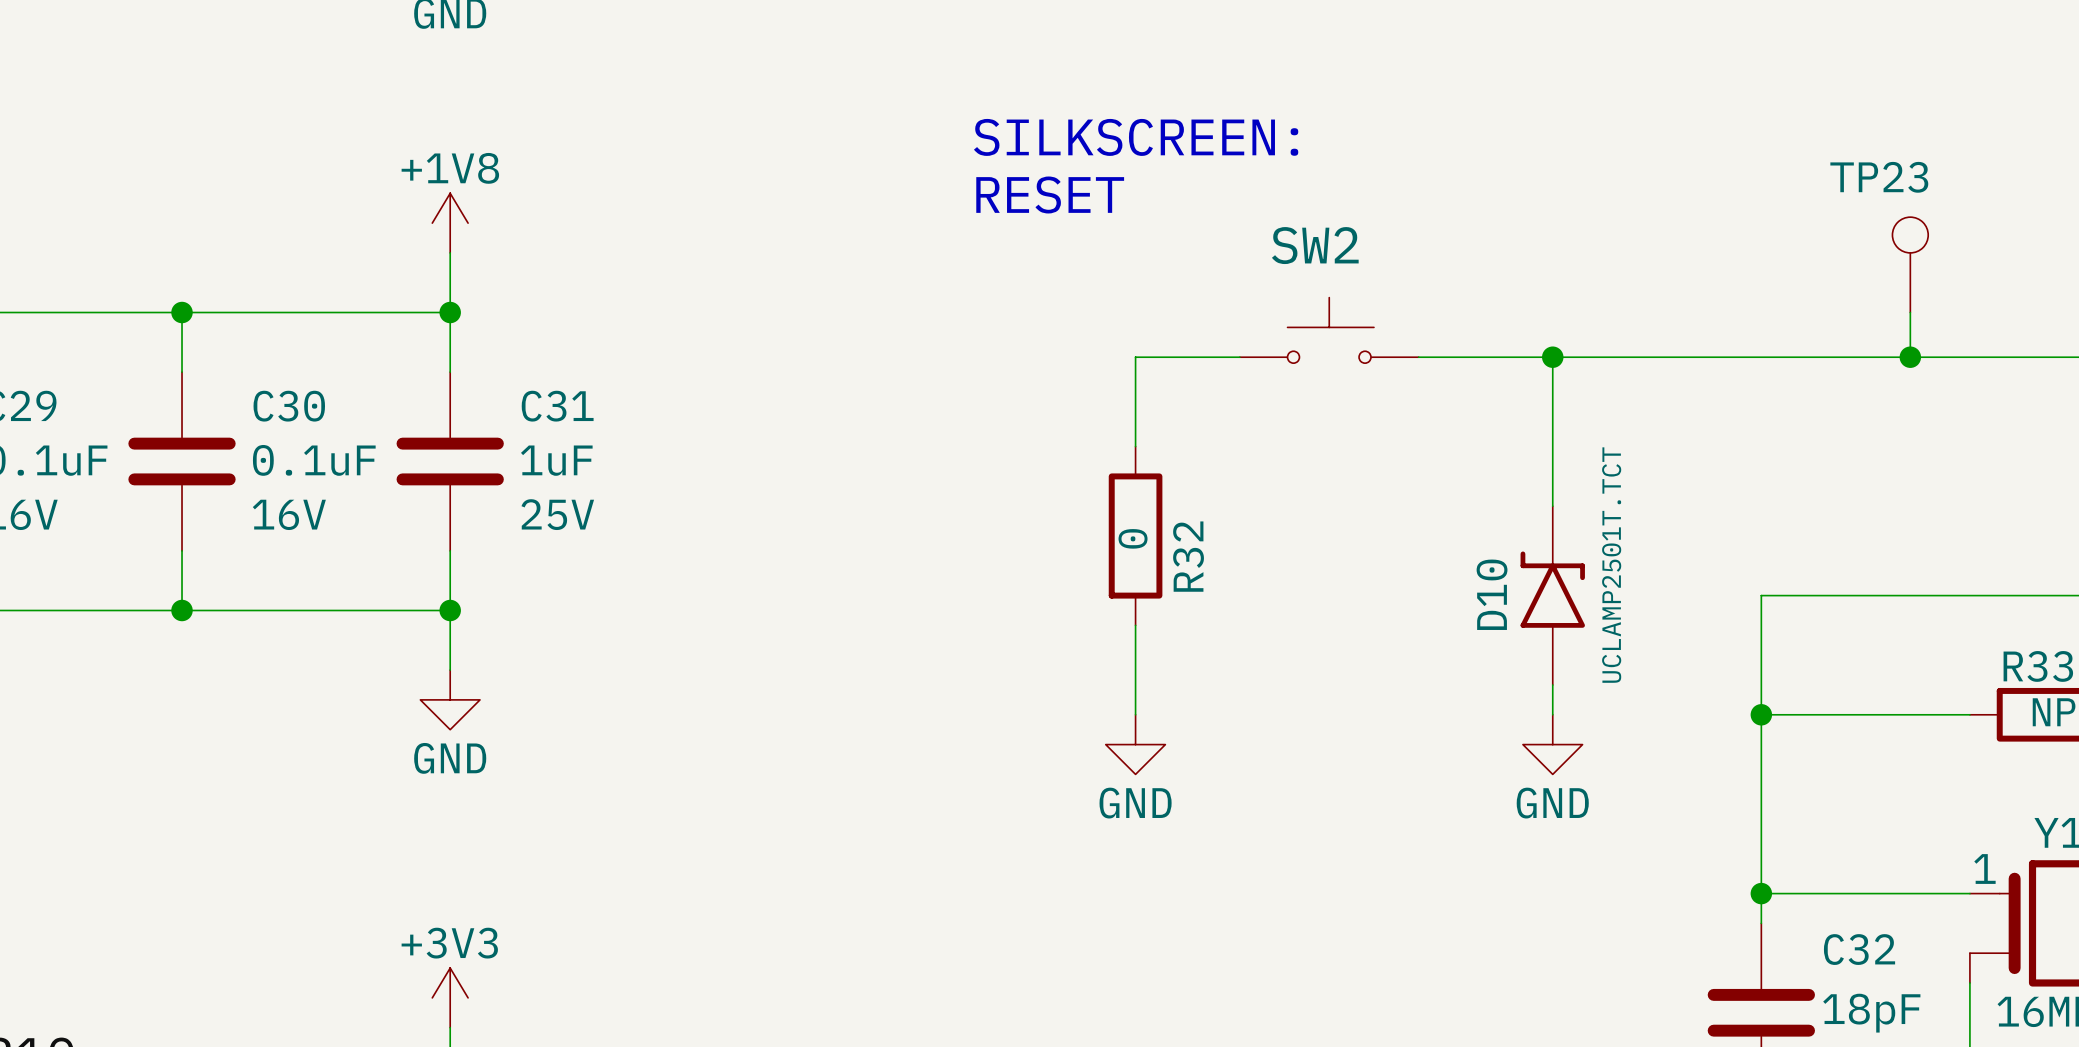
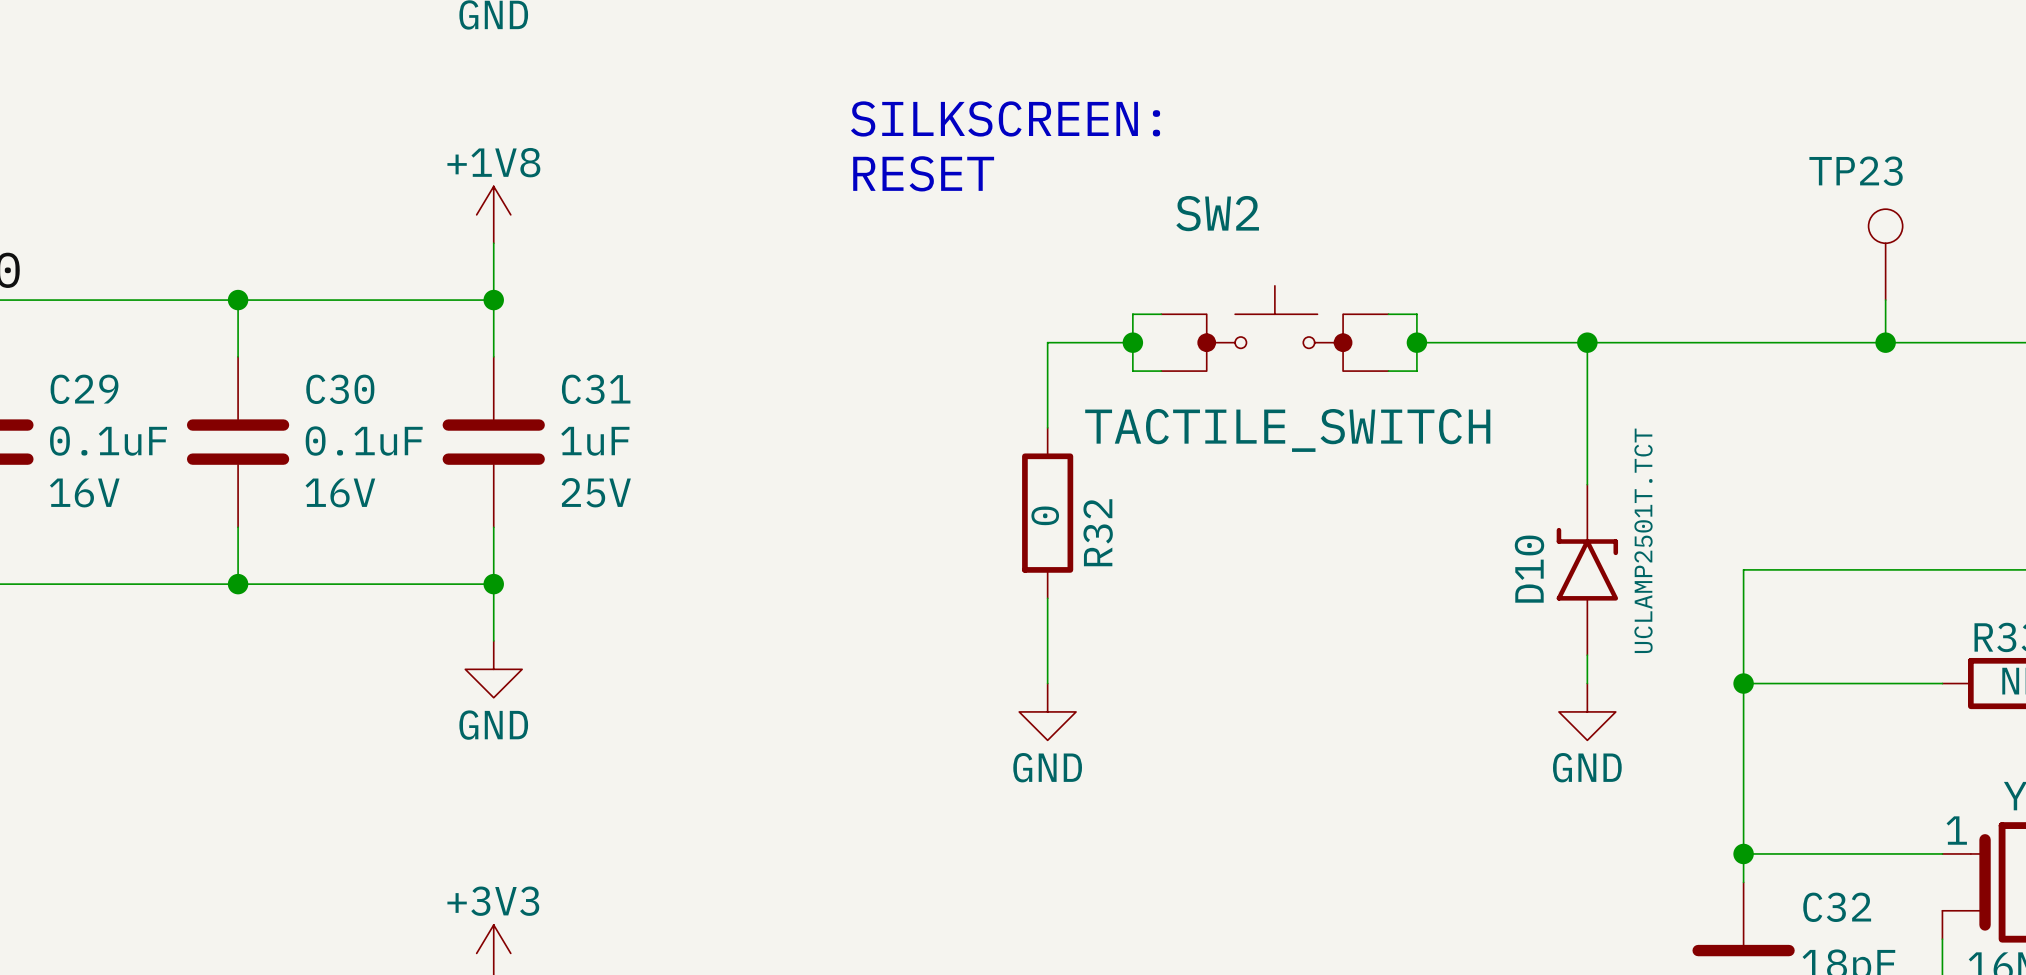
text position: SILKSCREEN: (1136, 137) -> SILKSCREEN: (1005, 118)
text position: RESET (1050, 194) -> RESET (923, 173)
SW2 name position: SW2 (1315, 245) -> SW2 (1217, 213)
SW2 symbol: [1239, 297, 1419, 364] -> [1161, 285, 1389, 372]
wire: none -> (1161, 314) (1132, 314) (1132, 371) (1161, 371)
wire: none -> (1388, 314) (1416, 314) (1416, 371) (1388, 371)
wire: none -> (1132, 342) (1047, 342) (1047, 427)
junction: none -> (1132, 342)
wire: (1239, 357) (1135, 357) (1135, 446) -> none
junction: none -> (1416, 342)
wire: (1552, 357) (1552, 506) -> (1587, 342) (1587, 484)
junction position: (1552, 357) -> (1587, 342)
SW2 value: none -> TACTILE_SWITCH (1287, 430)
R32 position: (1135, 536) -> (1047, 513)
D10 position: (1552, 595) -> (1587, 569)
wire: (1135, 625) (1135, 714) -> (1047, 598) (1047, 683)
wire: (1552, 684) (1552, 714) -> (1587, 655) (1587, 683)
power symbol position: GND (1135, 744) -> GND (1047, 711)
power symbol position: GND (1552, 744) -> GND (1587, 711)

